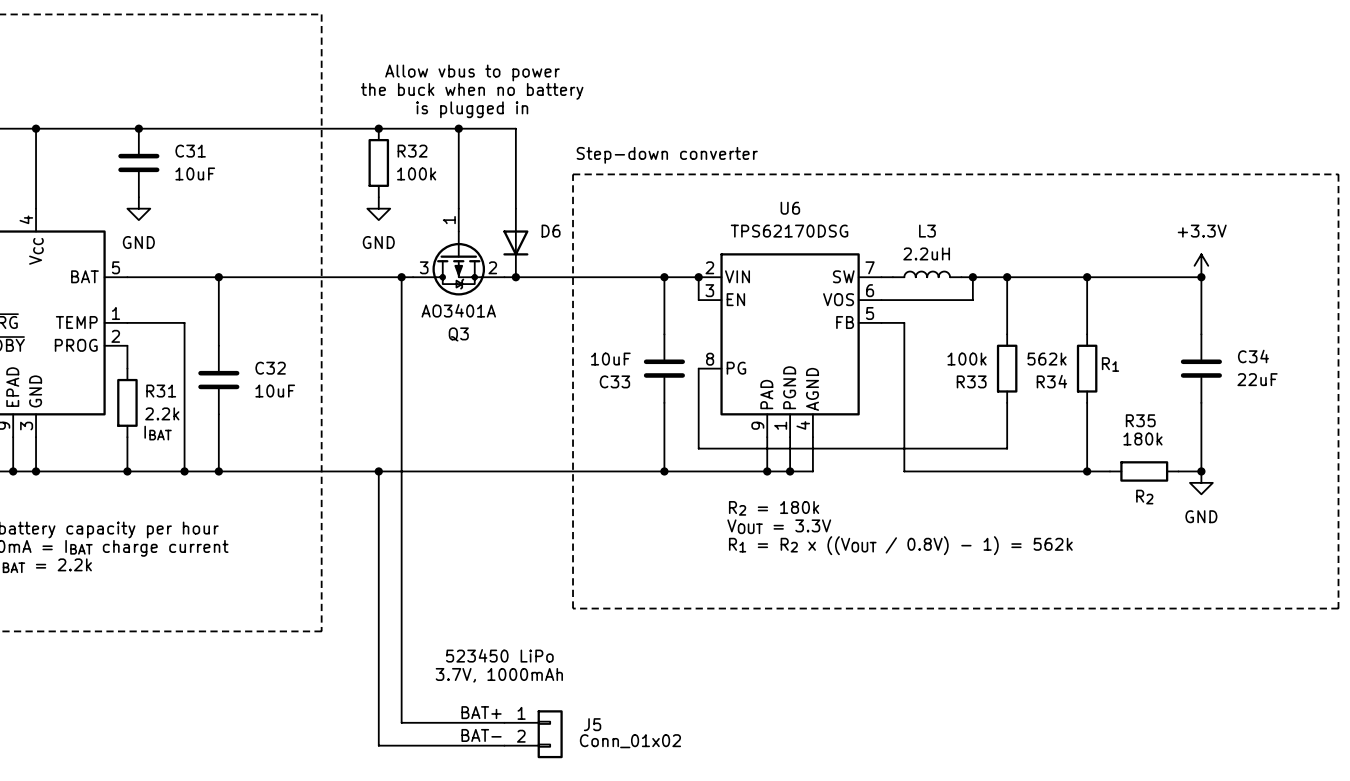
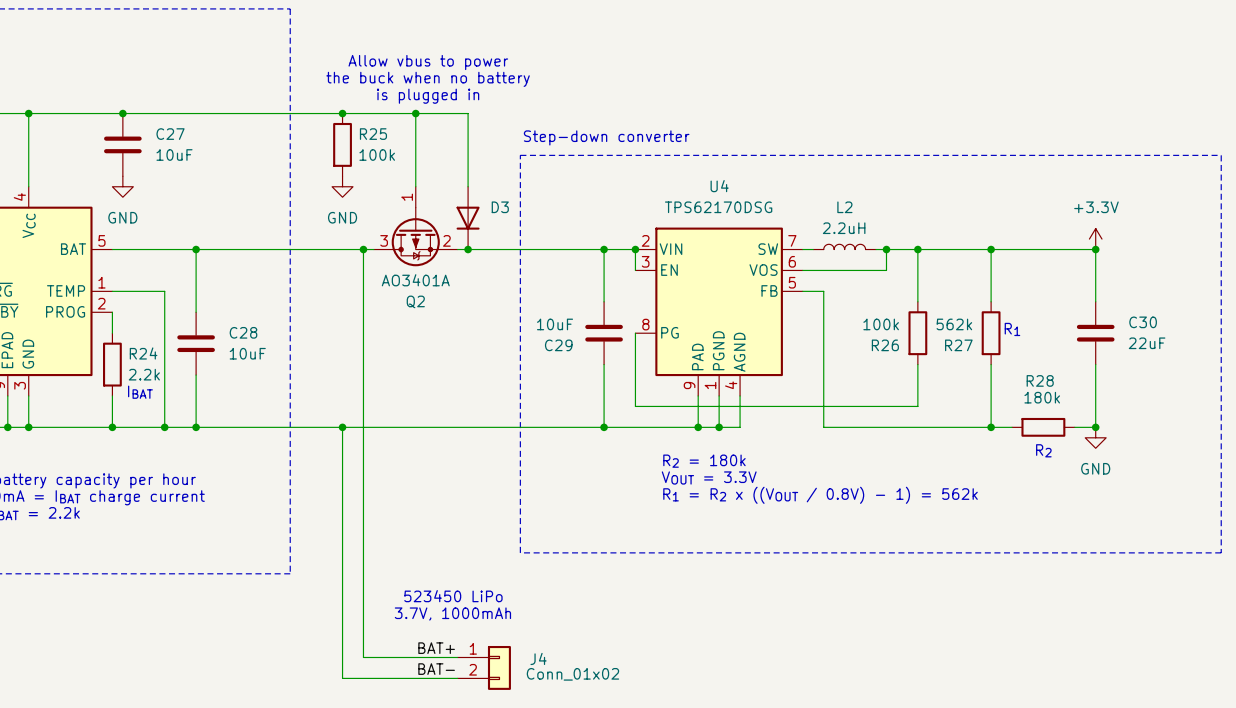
C31 name: C31 (190, 151) -> C27 (170, 134)
R32 name: R32 (412, 151) -> R25 (373, 134)
U6 name: U6 (790, 208) -> U4 (719, 186)
D6 name: D6 (551, 231) -> D3 (500, 207)
L3 name: L3 (927, 231) -> L2 (844, 207)
Q3 name: Q3 (458, 334) -> Q2 (415, 301)
C34 name: C34 (1253, 356) -> C30 (1143, 322)
C32 name: C32 (270, 368) -> C28 (243, 332)
C33 name: C33 (614, 381) -> C29 (558, 345)
R33 name: R33 (971, 381) -> R26 (885, 345)
R34 name: R34 (1051, 381) -> R27 (958, 345)
R31 name: R31 (161, 391) -> R24 (143, 353)
R35 name: R35 (1140, 420) -> R28 (1040, 380)
J5 name: J5 (592, 724) -> J4 (538, 658)

